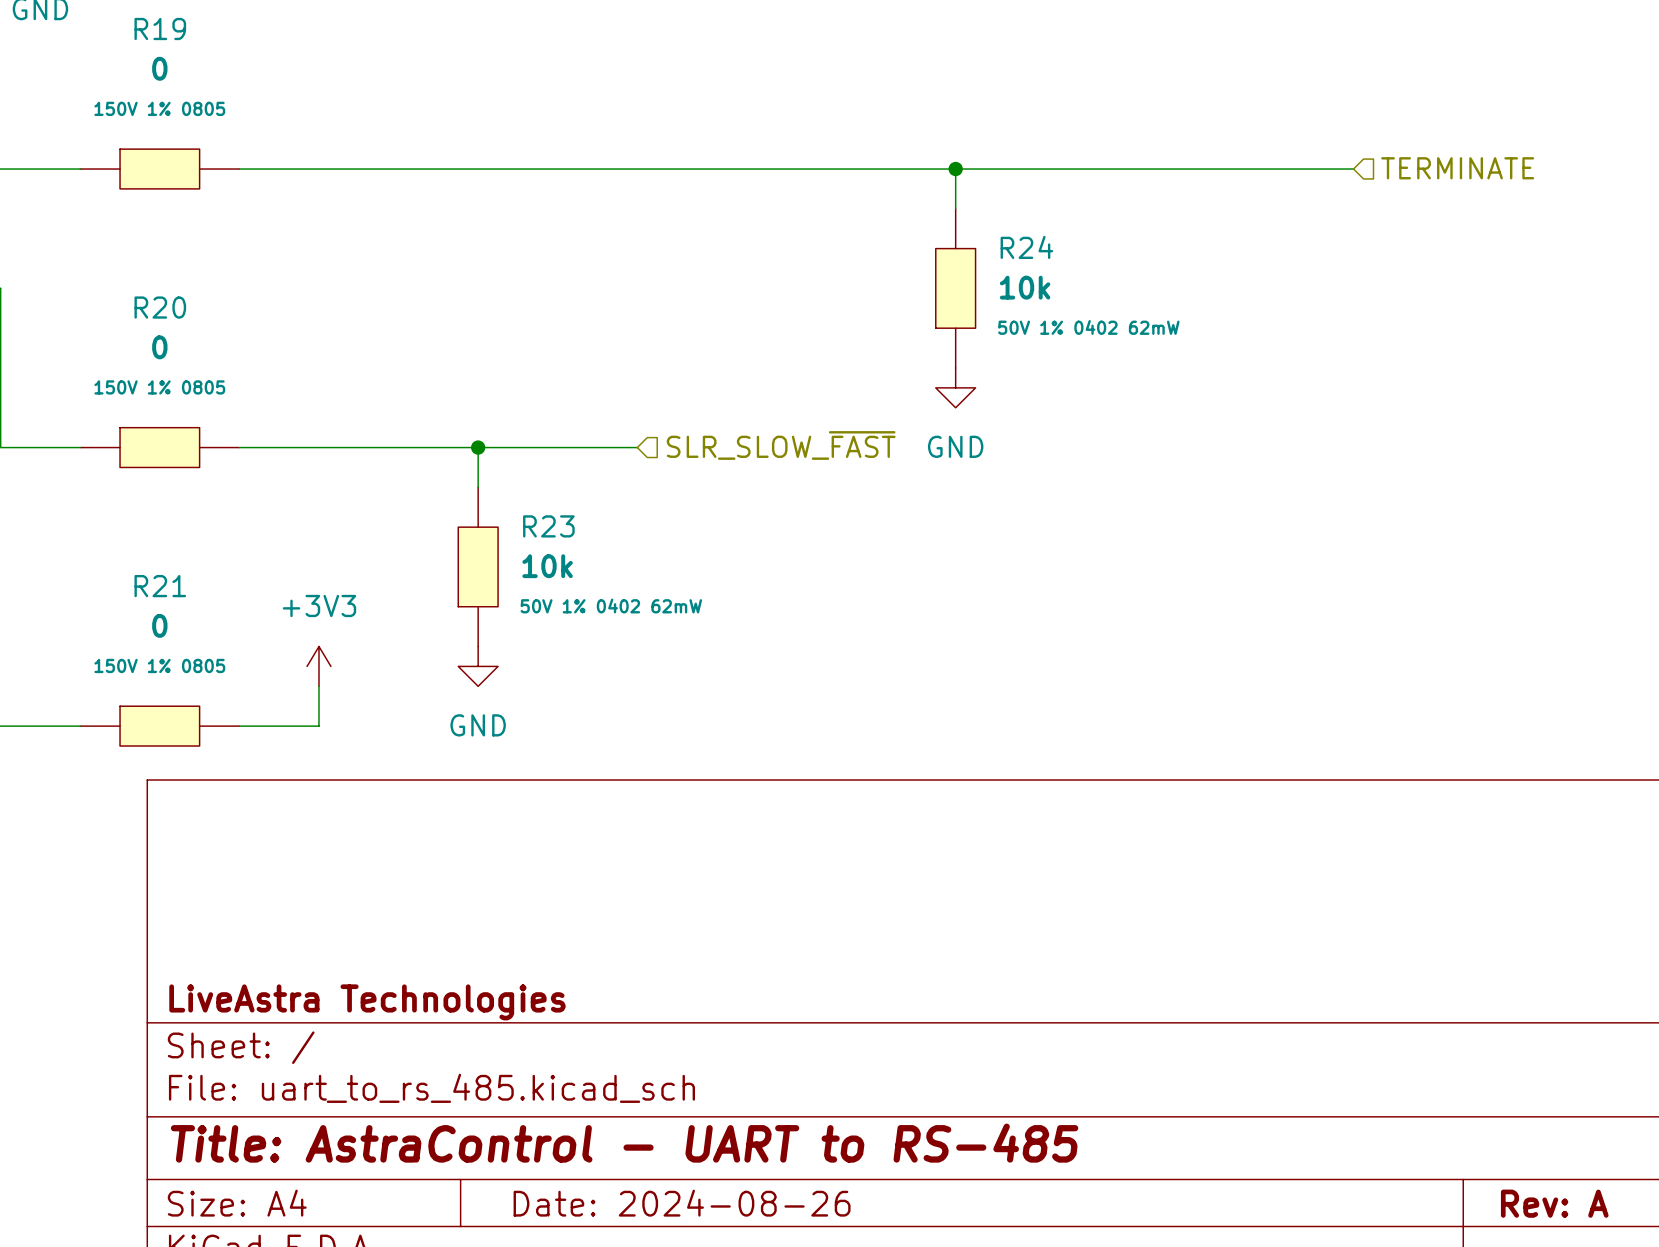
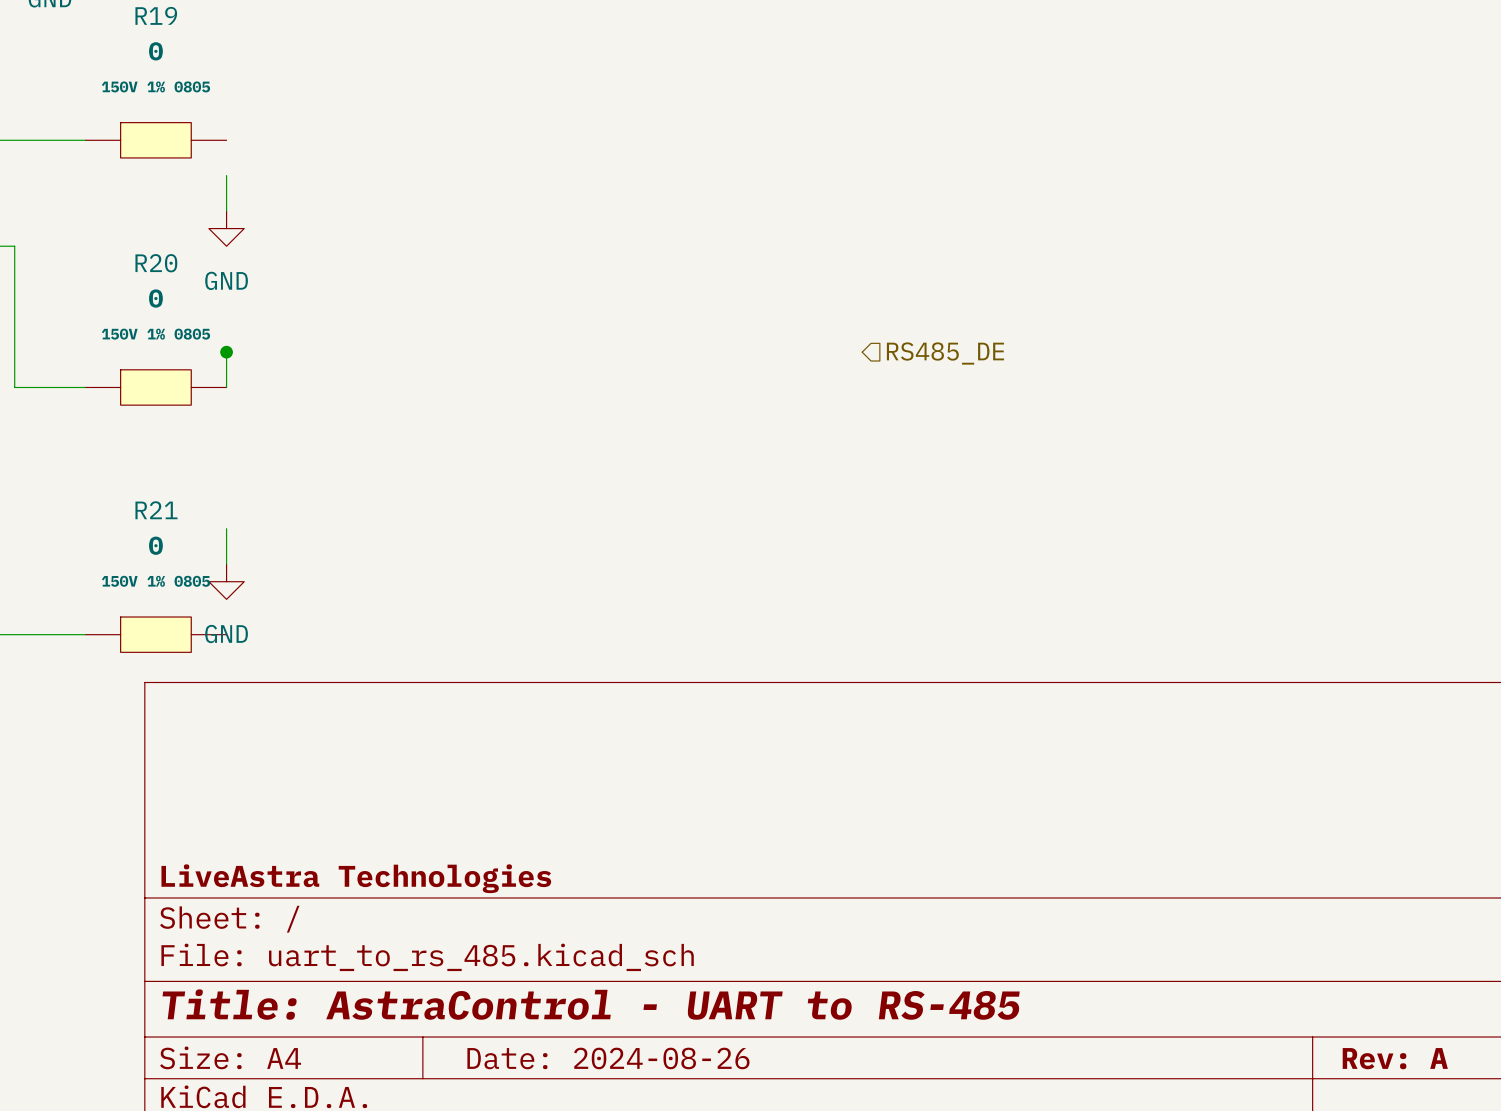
hierarchical label: TERMINATE (1457, 168) -> none
wire: (239, 169) (1353, 169) -> none
wire: (955, 169) (955, 208) -> none
junction: (955, 169) -> none
wire: none -> (226, 175) (226, 210)
power symbol: none -> GND (226, 228)
R24: 10k (955, 288) -> none
power symbol: GND (955, 387) -> none
junction: none -> (226, 352)
hierarchical label: none -> RS485_DE (945, 353)
hierarchical label: SLR_SLOW_~{FAST} (781, 445) -> none
wire: (239, 447) (637, 447) -> (226, 387) (226, 352)
wire: (478, 447) (478, 487) -> (226, 528) (226, 564)
junction: (478, 447) -> none
R23: 10k (478, 566) -> none
power symbol: none -> GND (226, 581)
power symbol: +3V3 (318, 666) -> none
power symbol: GND (478, 666) -> none
wire: (318, 686) (318, 726) (239, 726) -> none

